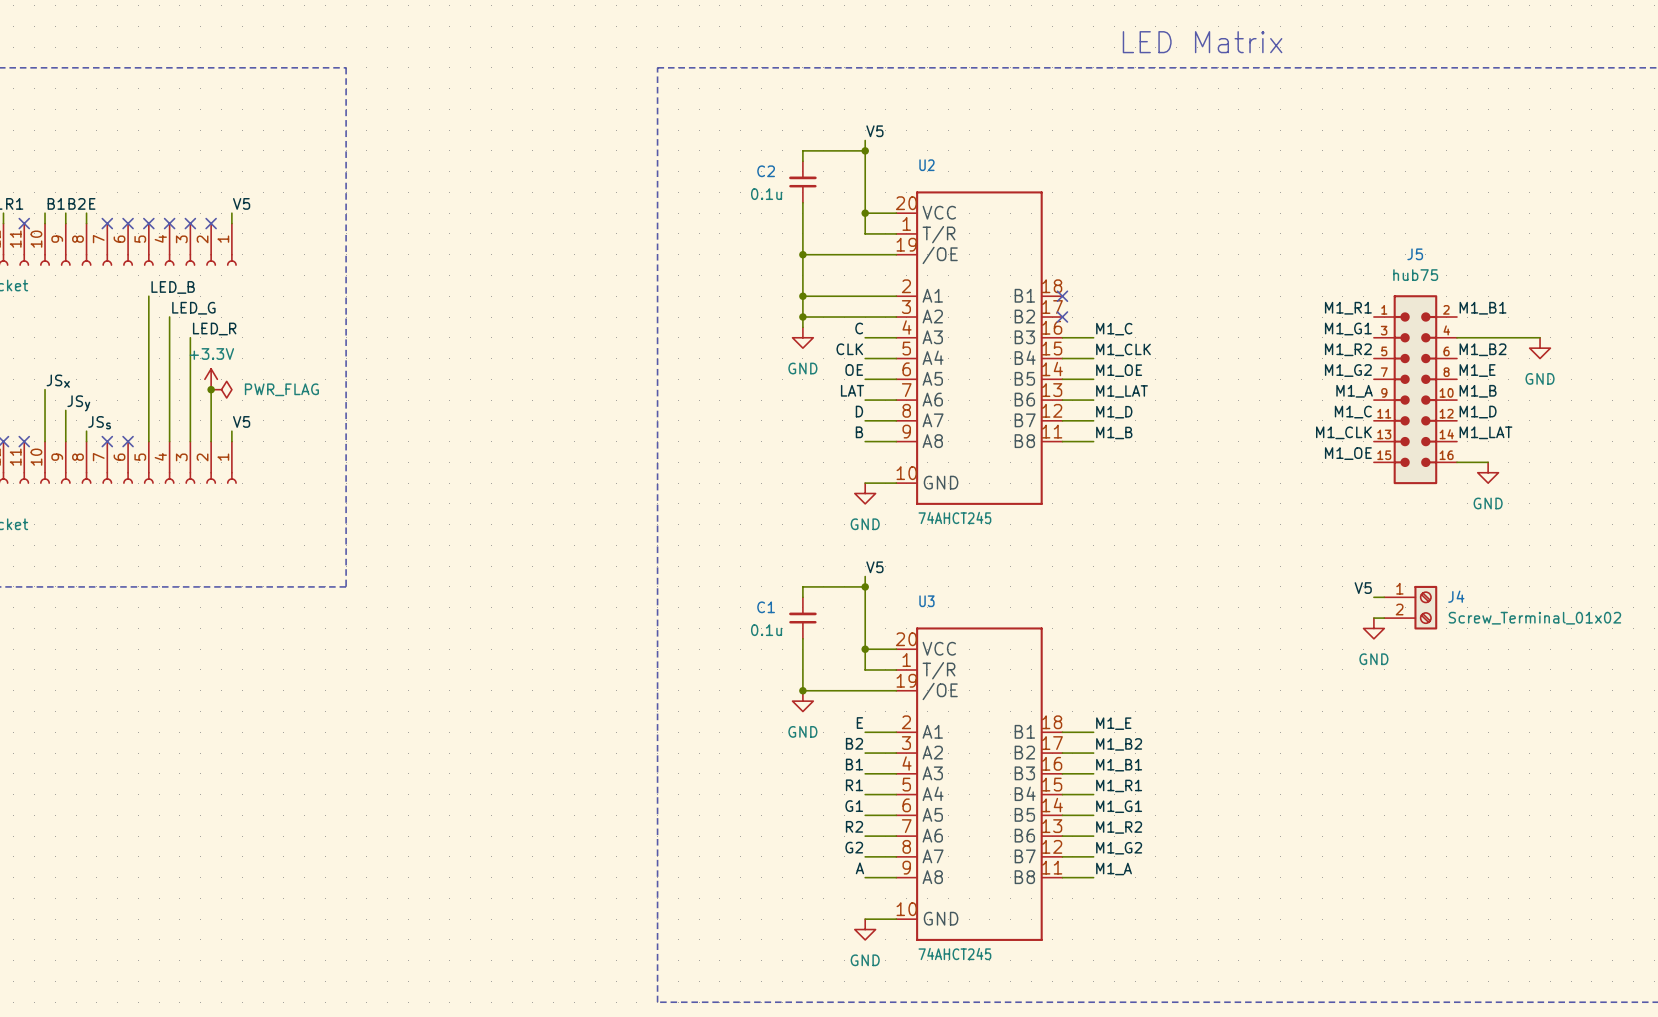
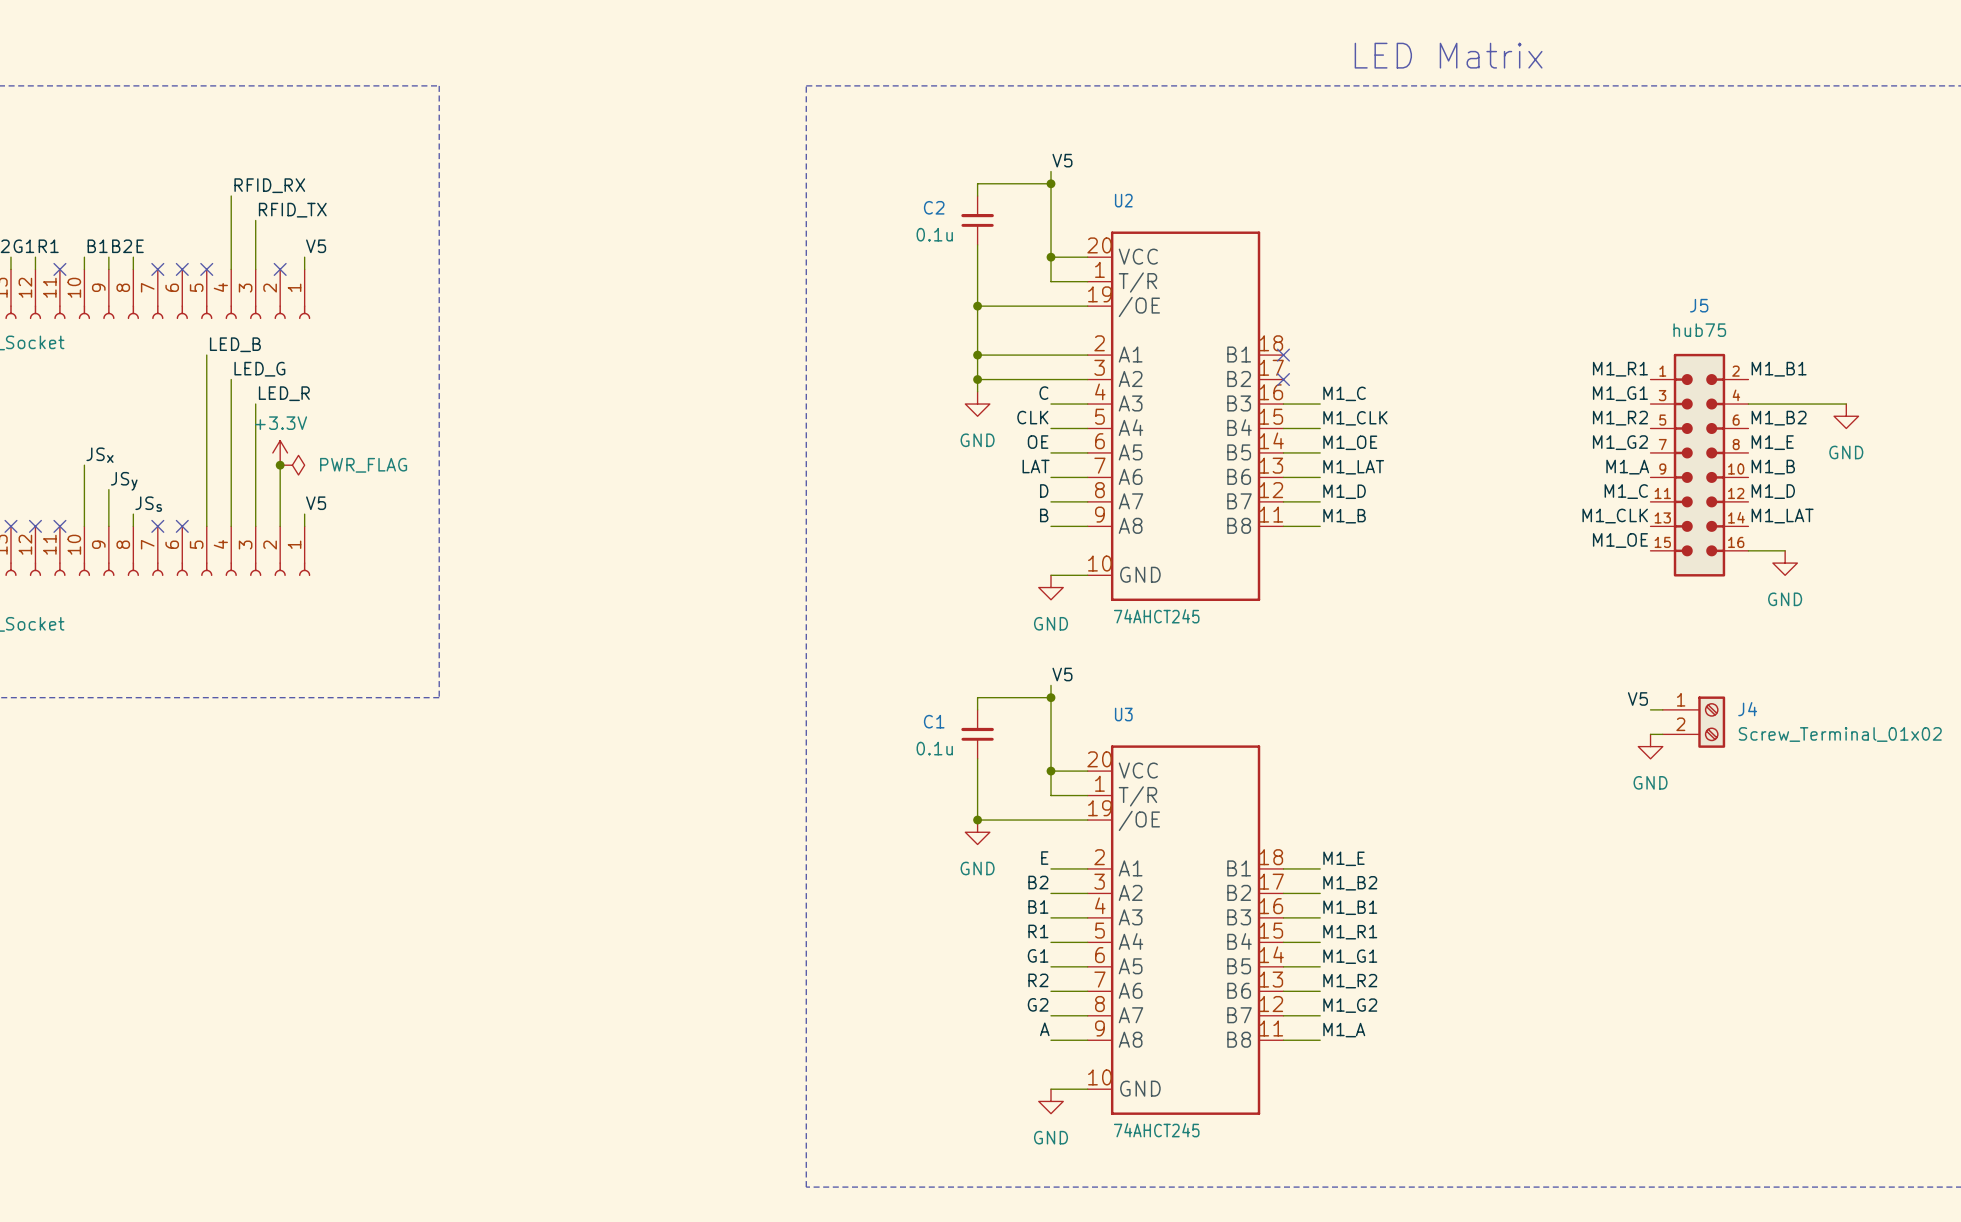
label: none -> RFID_RX (269, 185)
wire: none -> (231, 196) (231, 269)
label: none -> RFID_TX (292, 210)
wire: none -> (255, 220) (255, 269)
no-connect mark: (169, 223) -> none
no-connect mark: (190, 223) -> none

